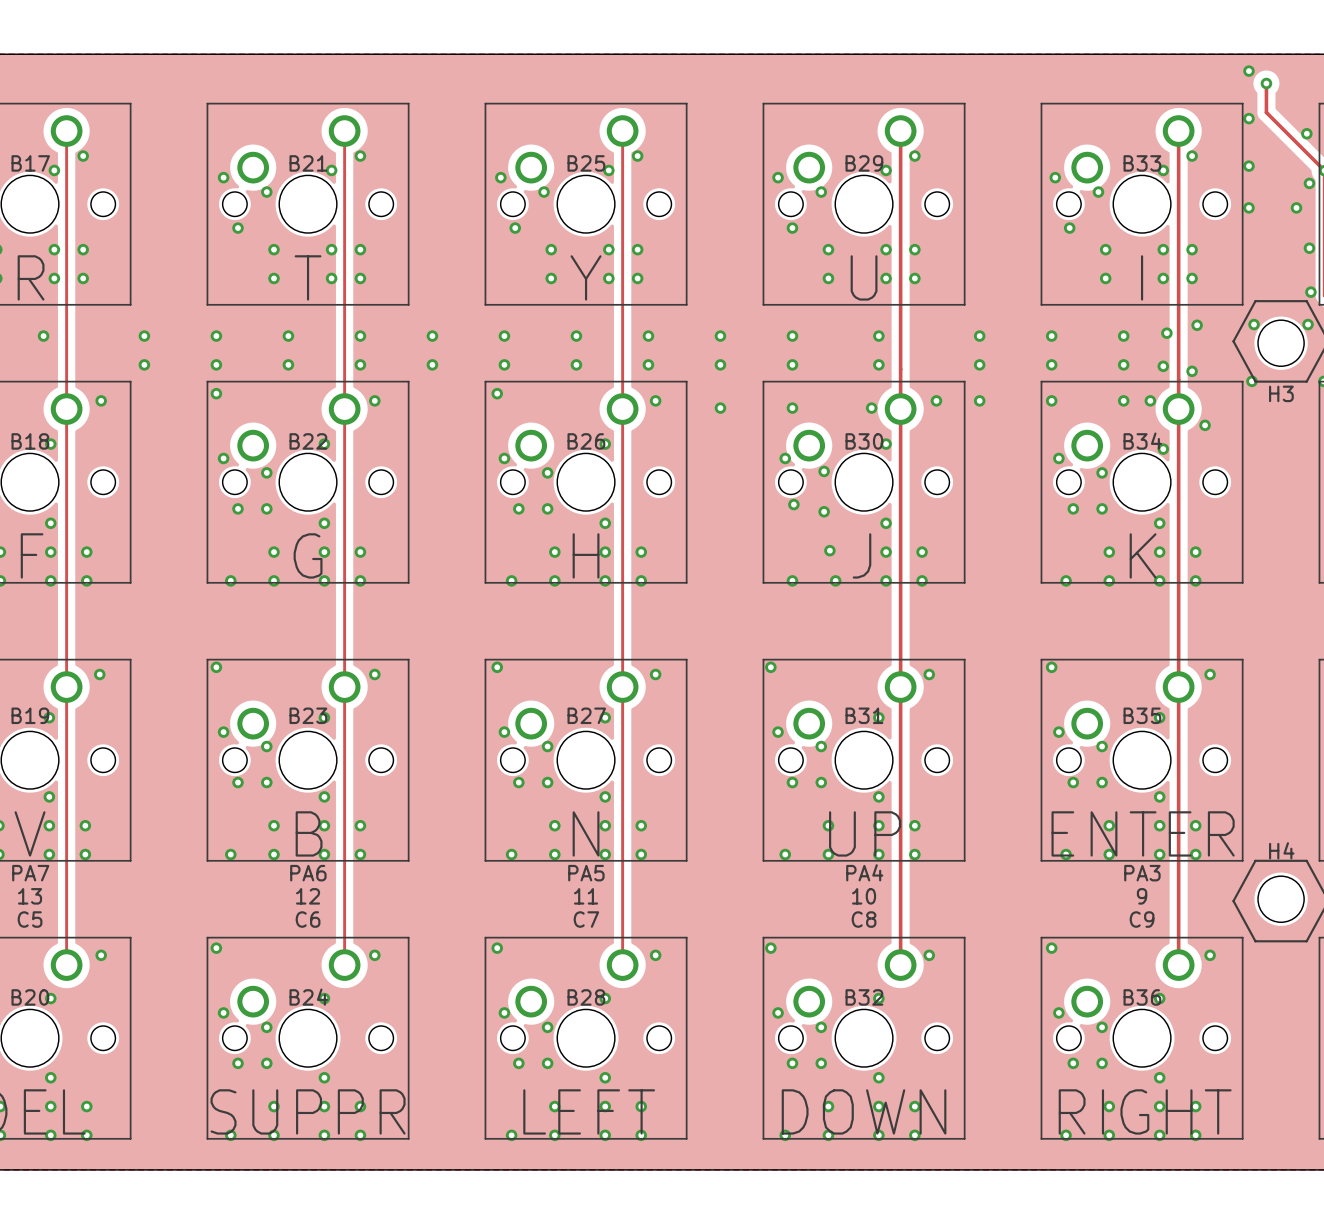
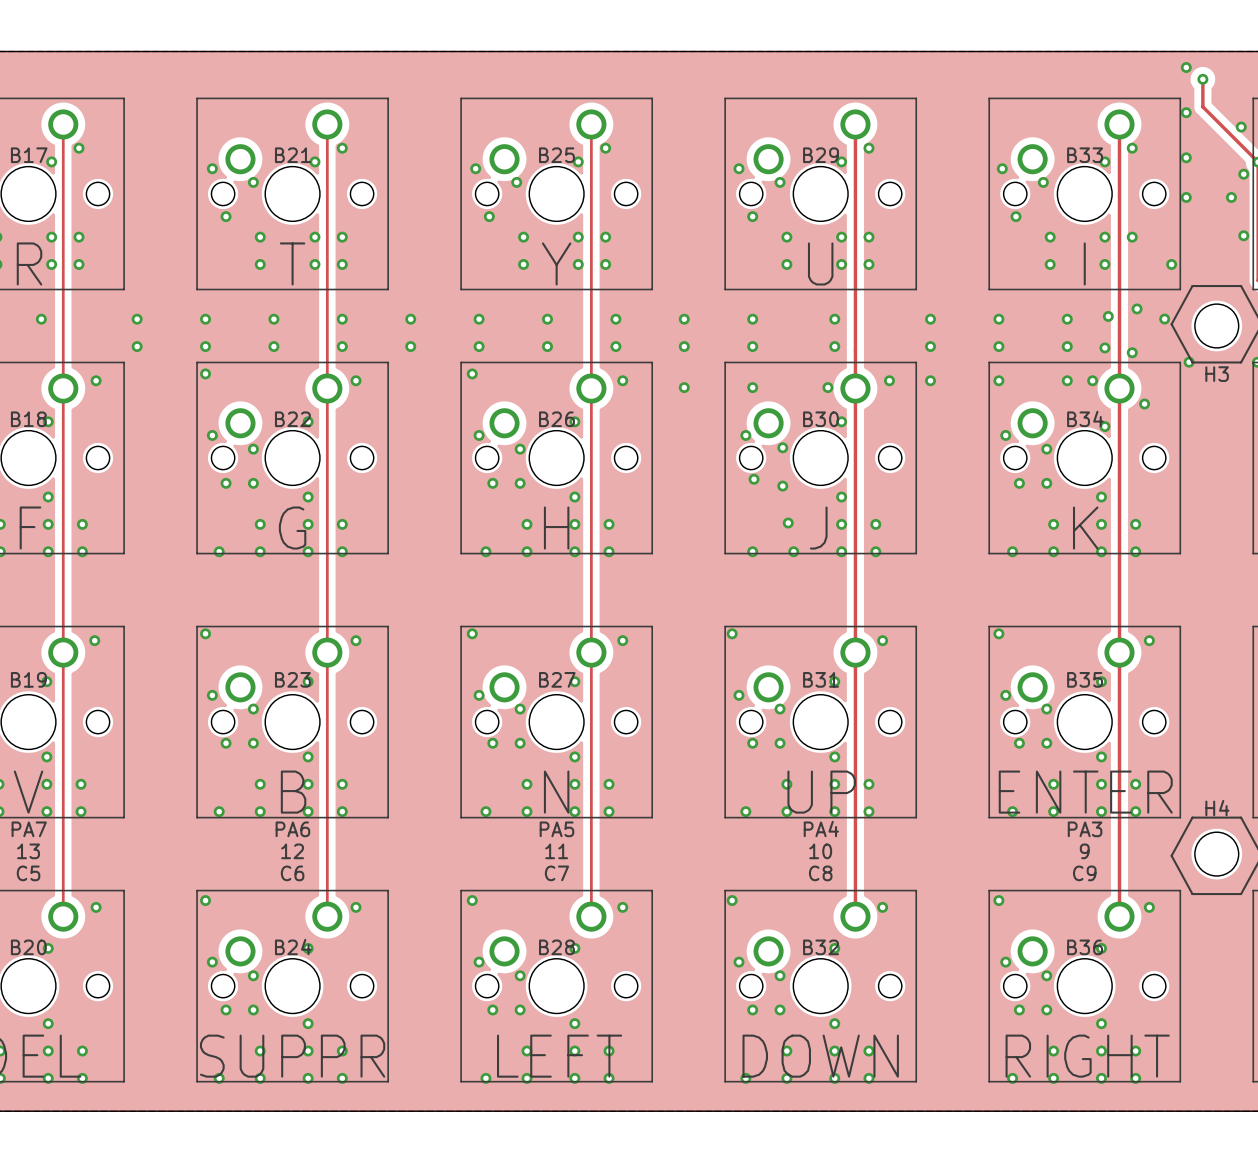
via: (1192, 278) -> none
via: none -> (1171, 264)
via: (1310, 292) -> none
via: (1254, 324) -> none
via: (1308, 324) -> none
via: none -> (1164, 319)

